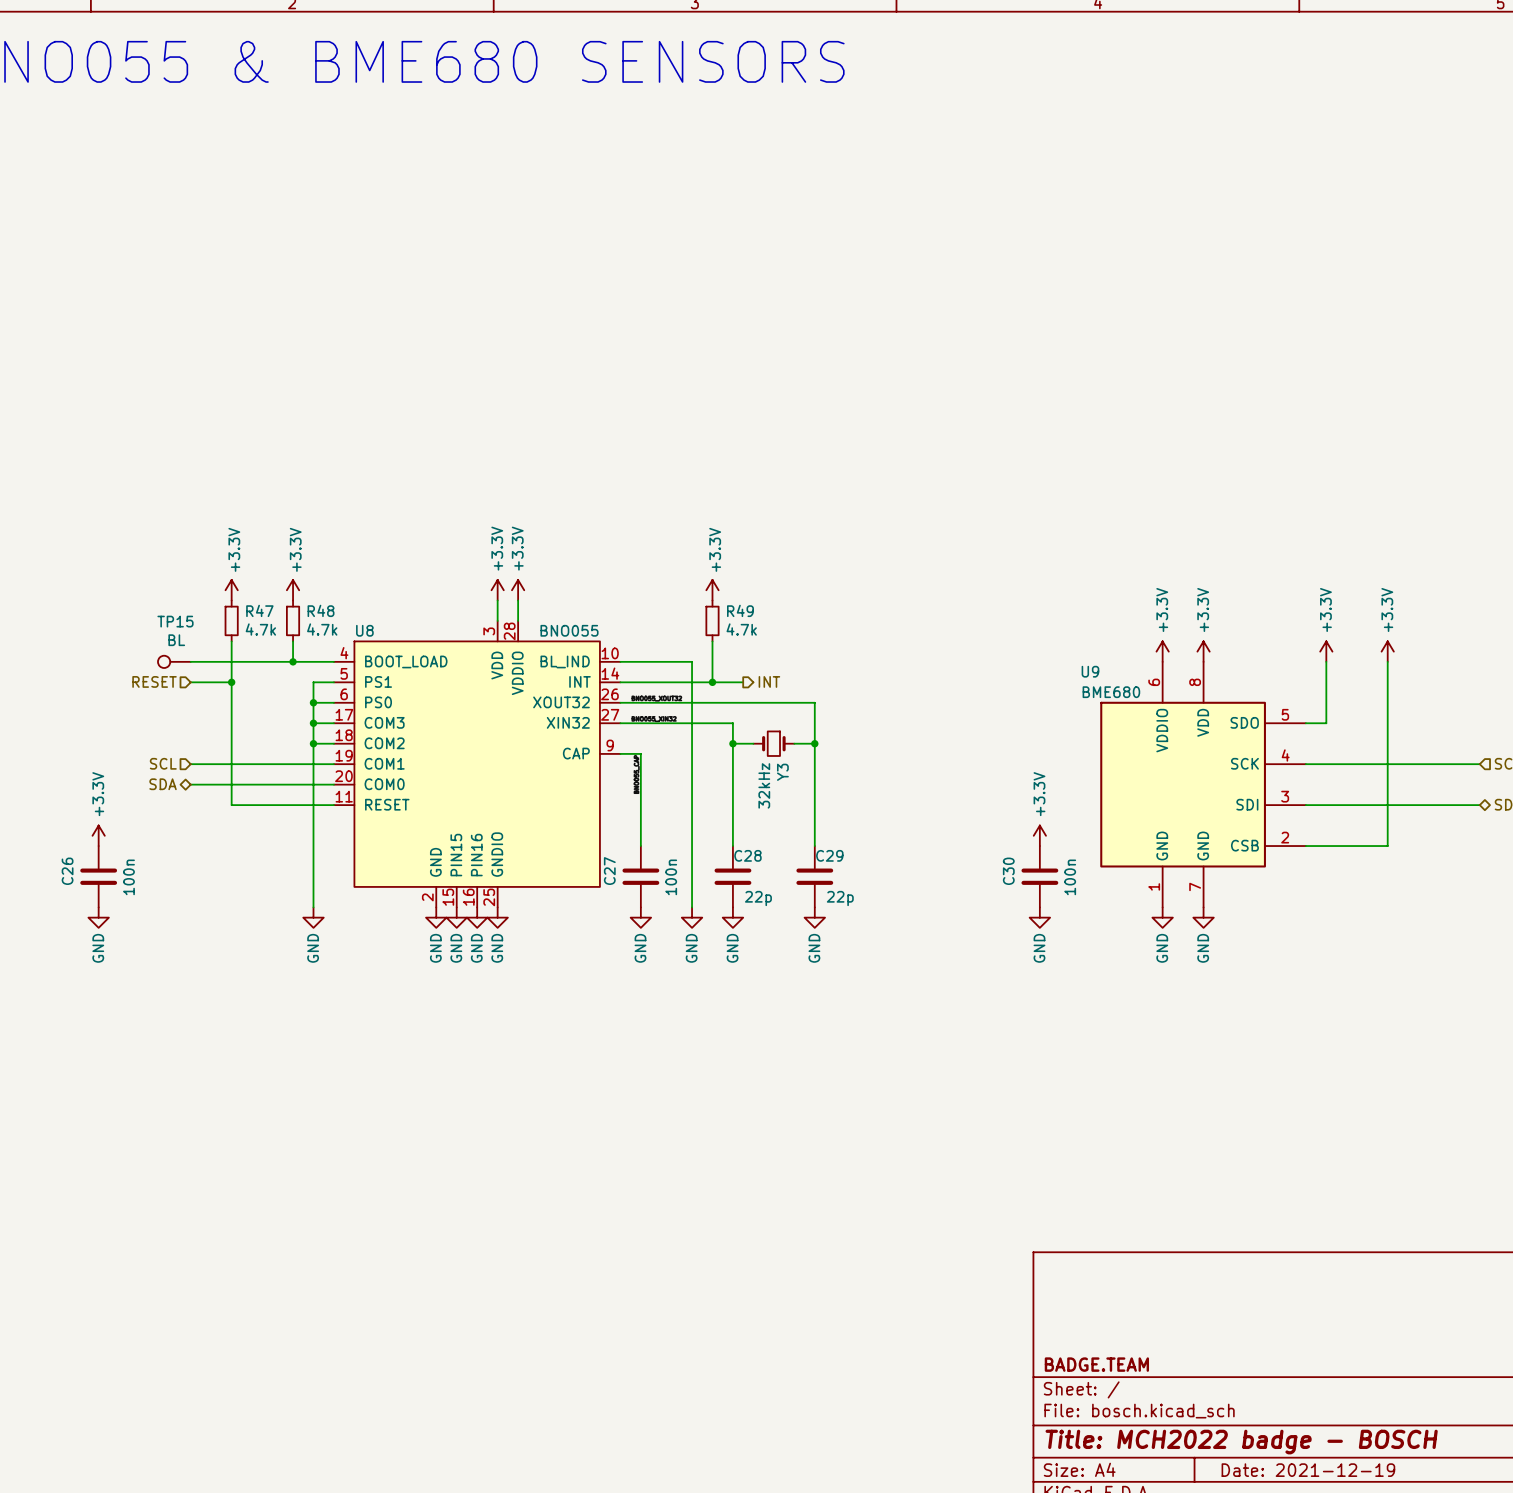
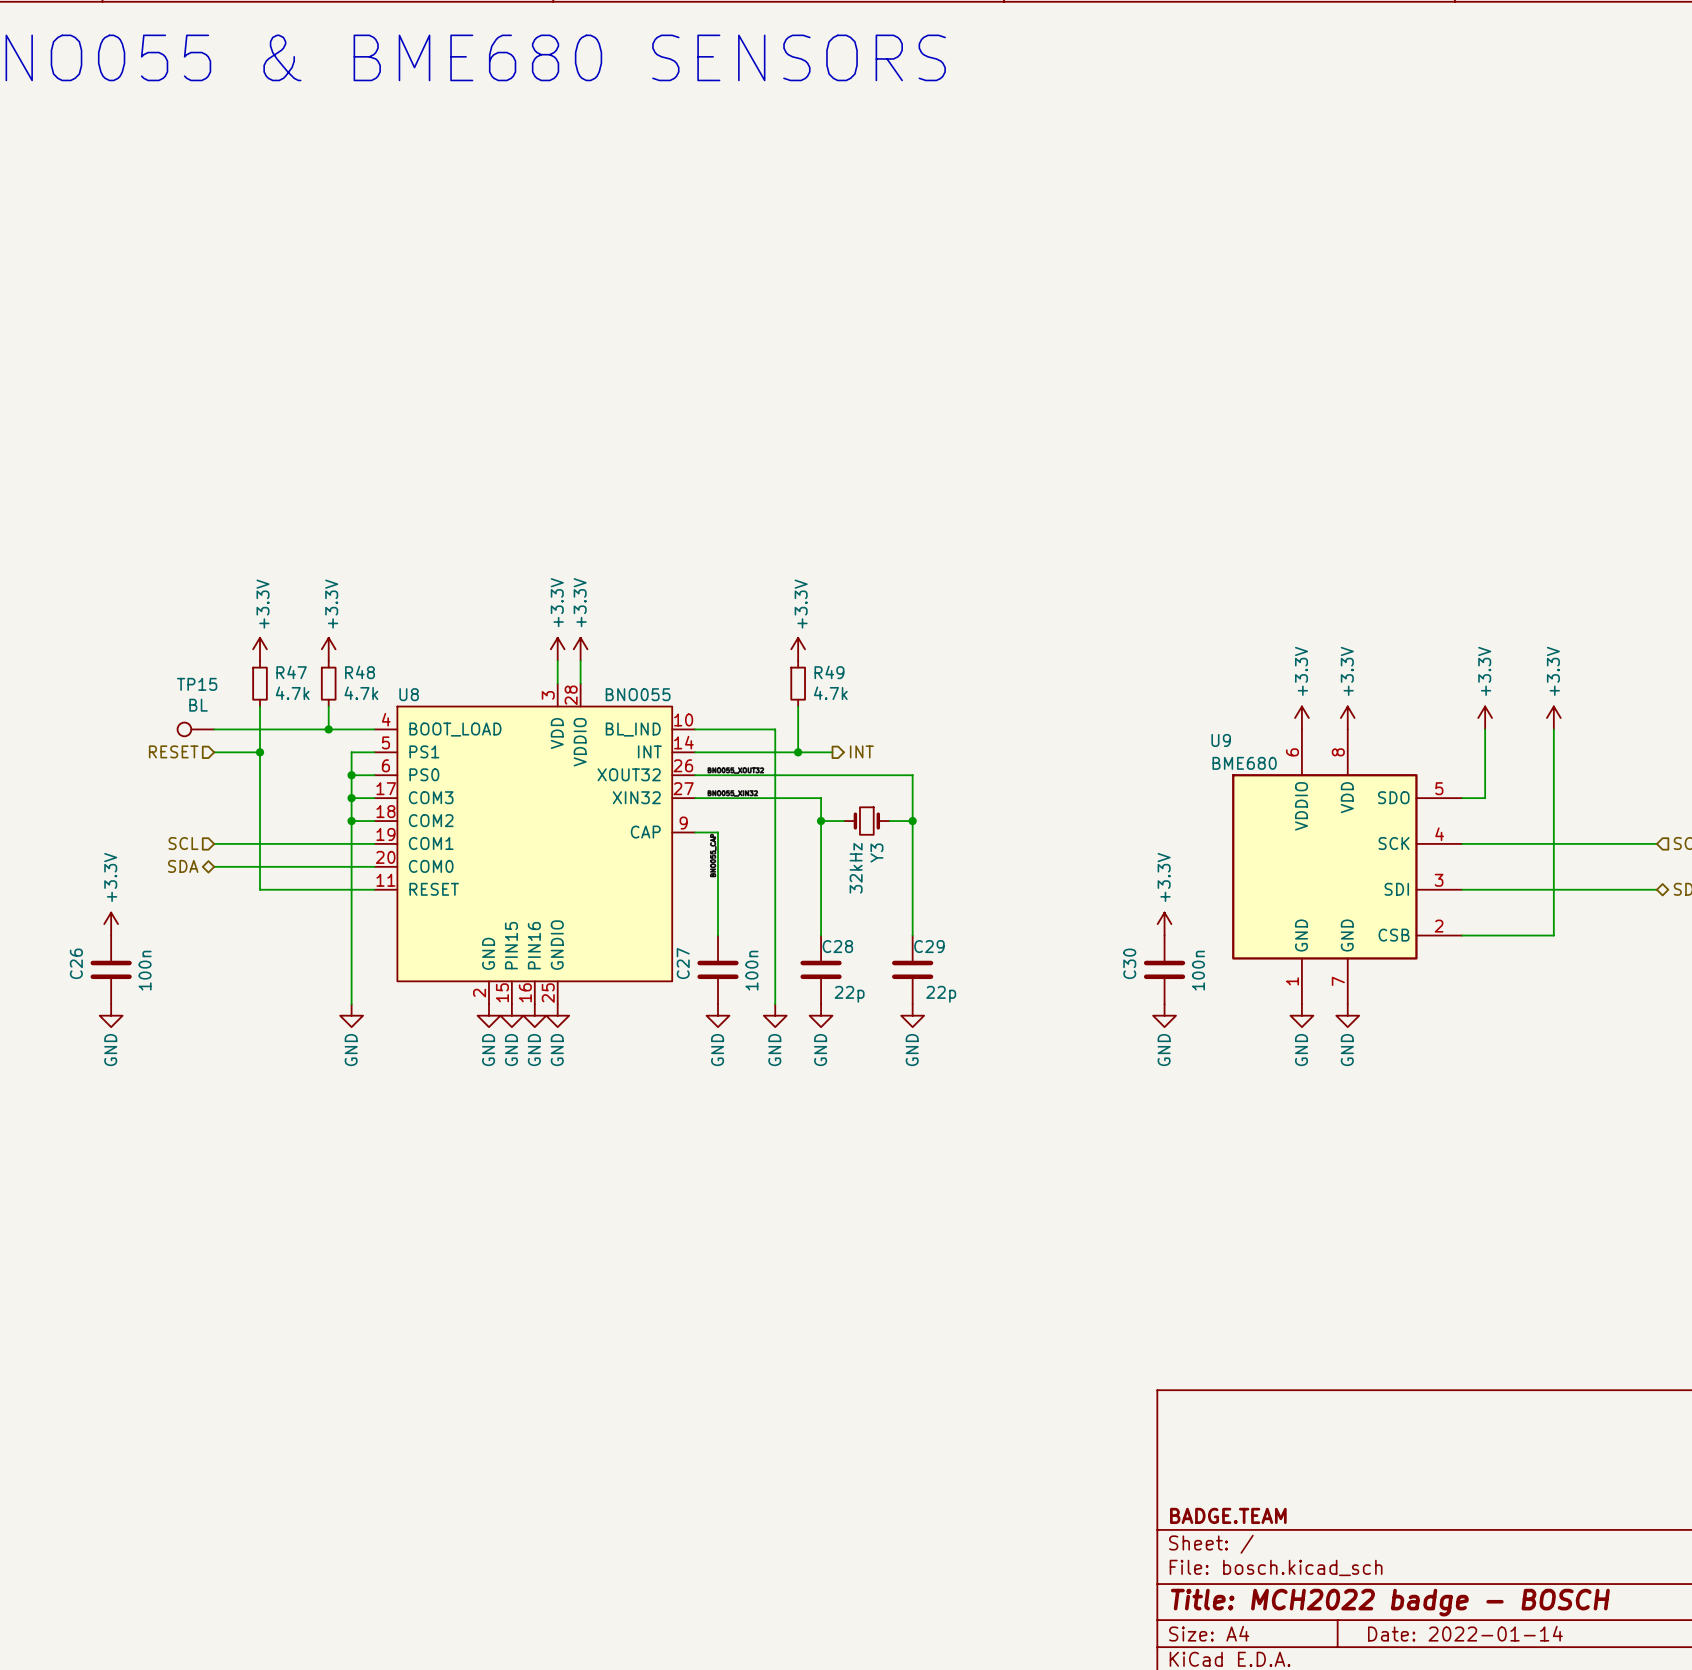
title block: Date: 2021-12-19 (1308, 1470) -> Date: 2022-01-14 (1465, 1633)

